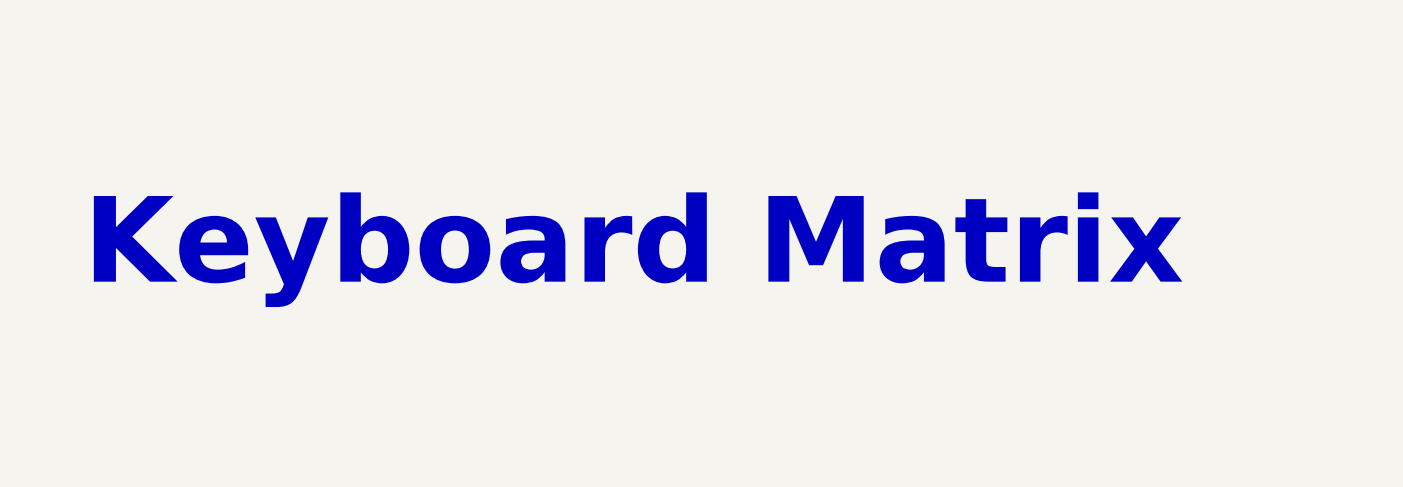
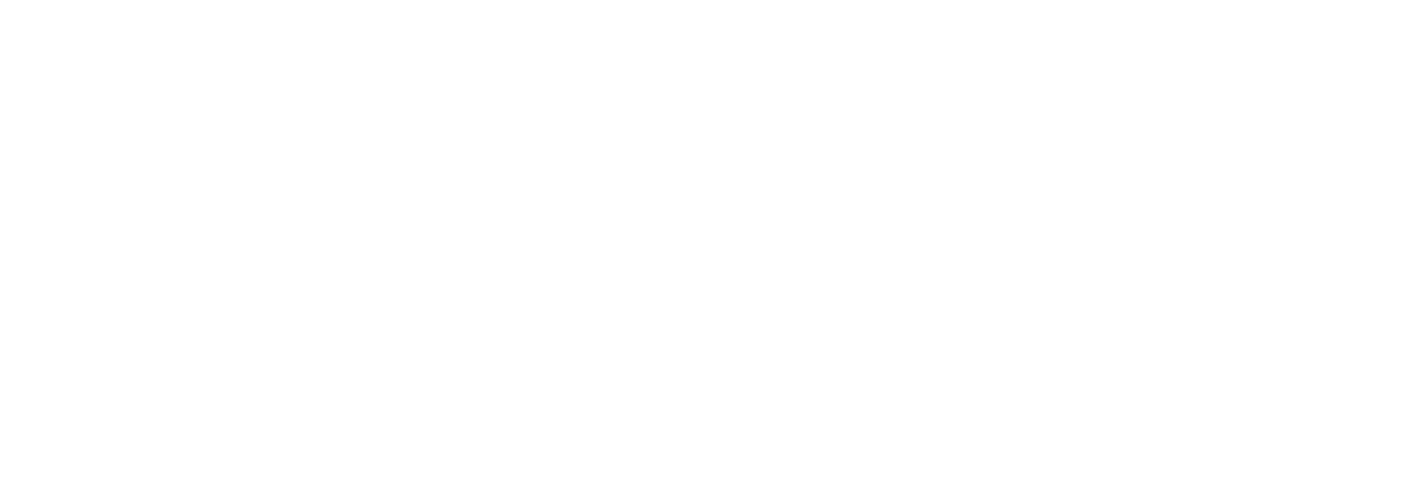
text: Keyboard Matrix (638, 249) -> none

